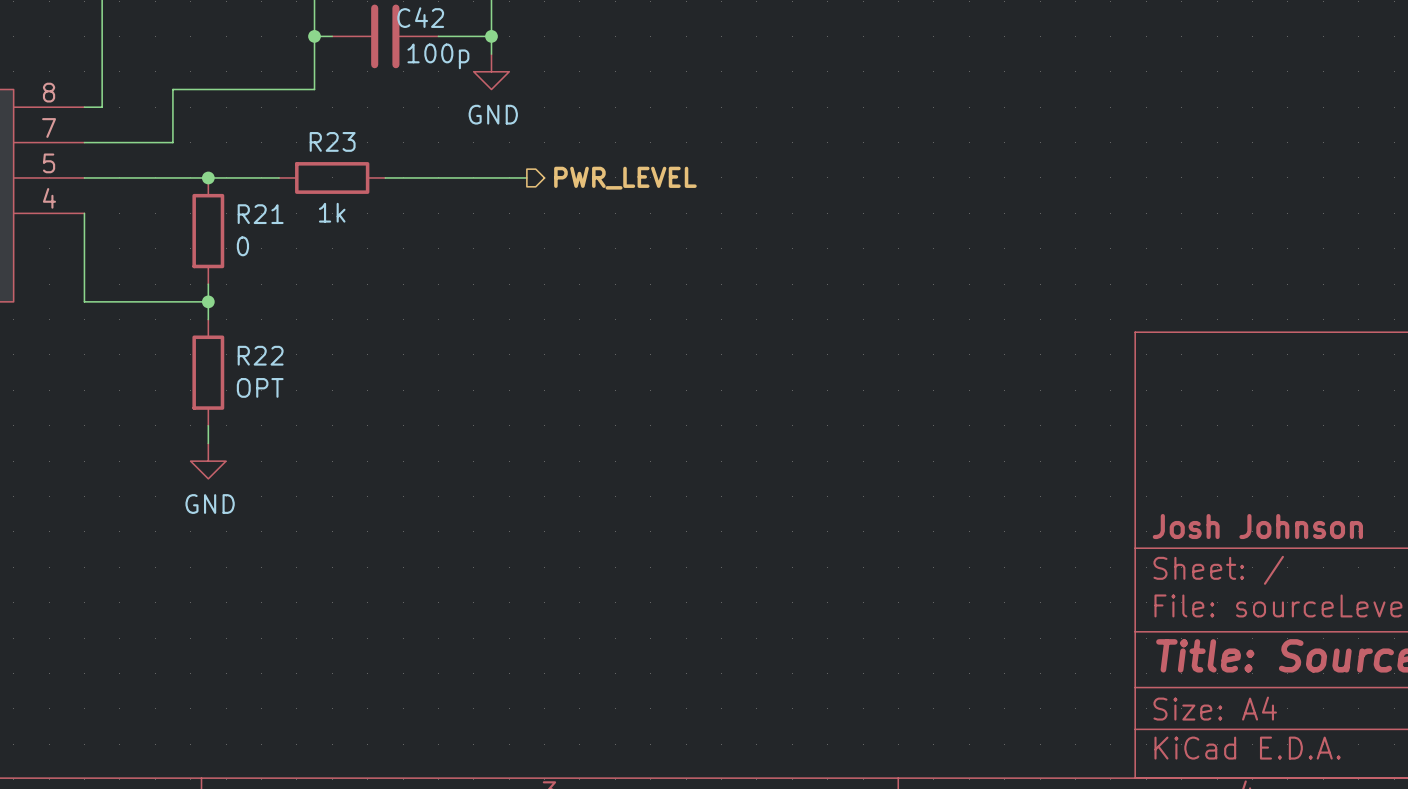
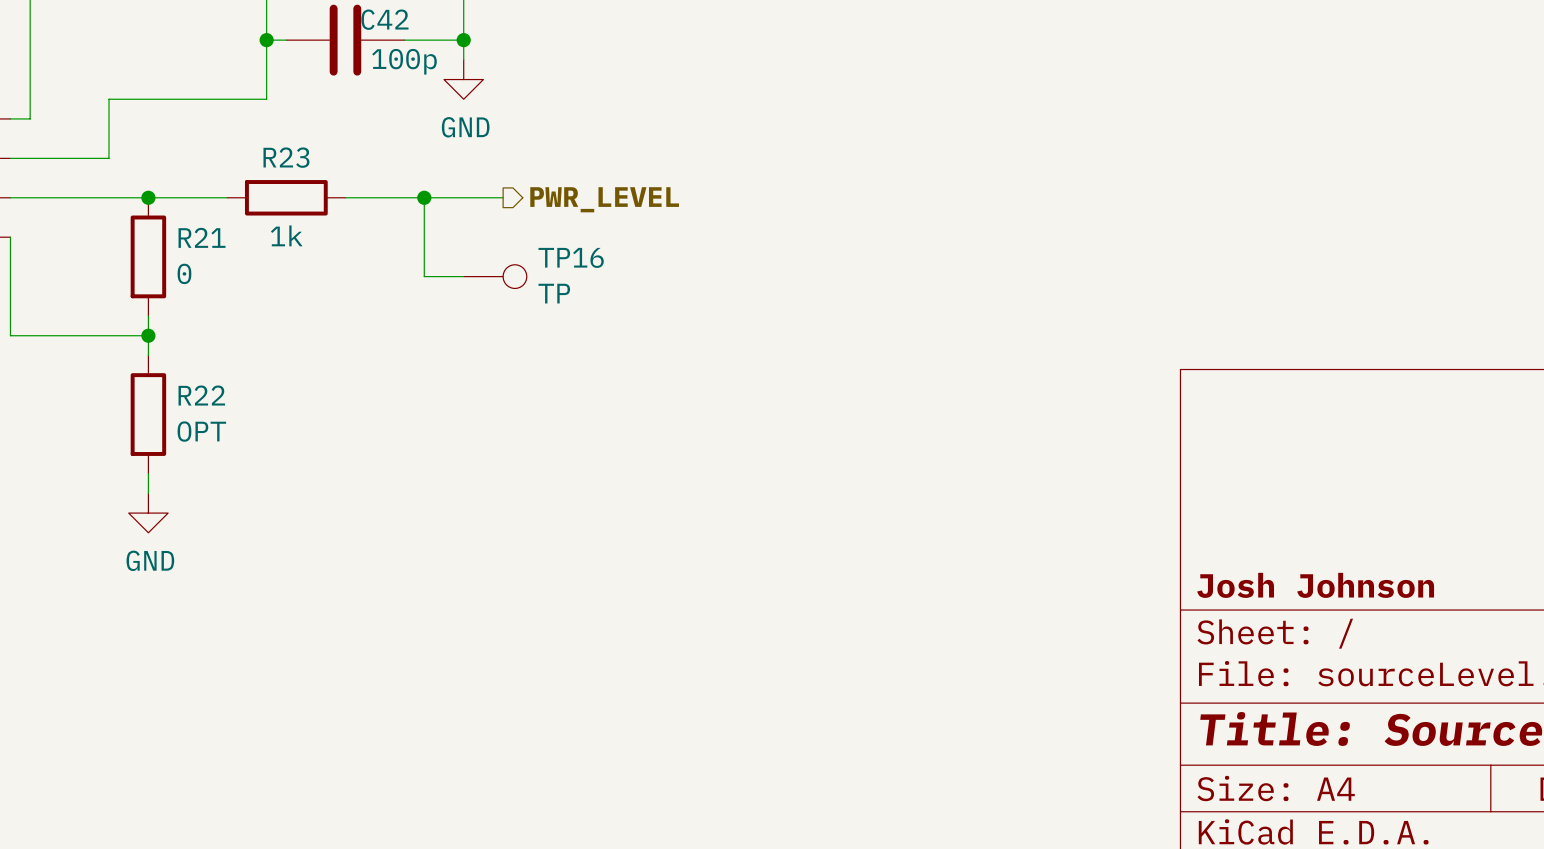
wire: none -> (424, 197) (424, 276) (463, 276)
junction: none -> (424, 197)
TP16: none -> TP (495, 276)

